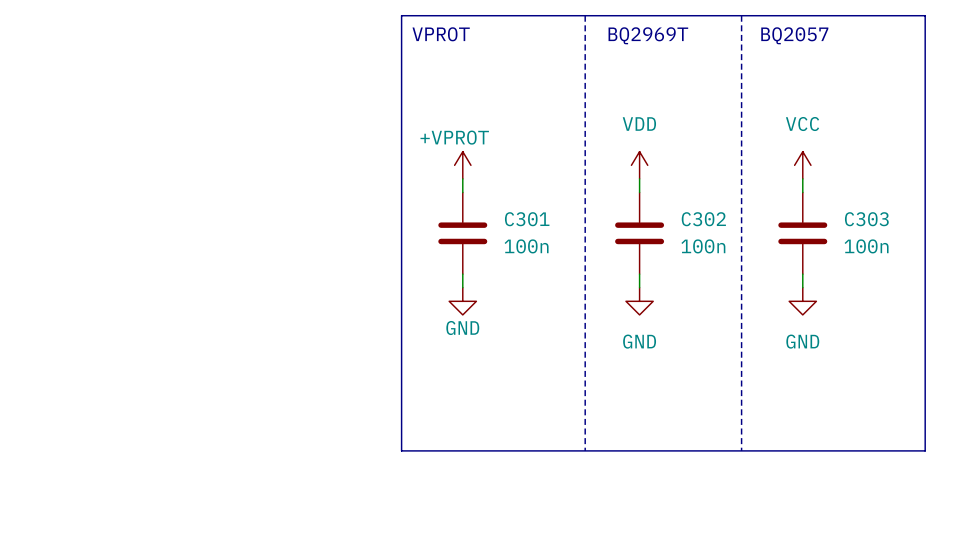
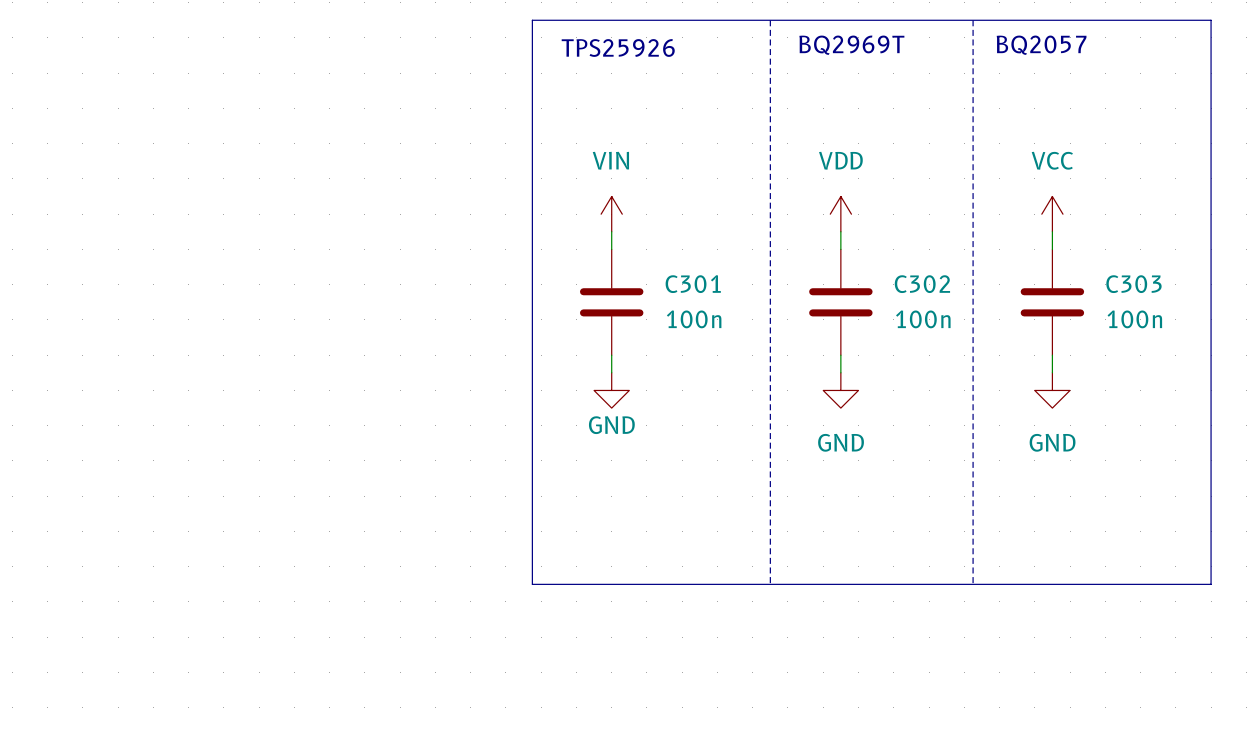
text: VPROT (441, 34) -> none
text: none -> TPS25926 (618, 47)
power symbol: +VPROT (462, 165) -> VIN (611, 214)

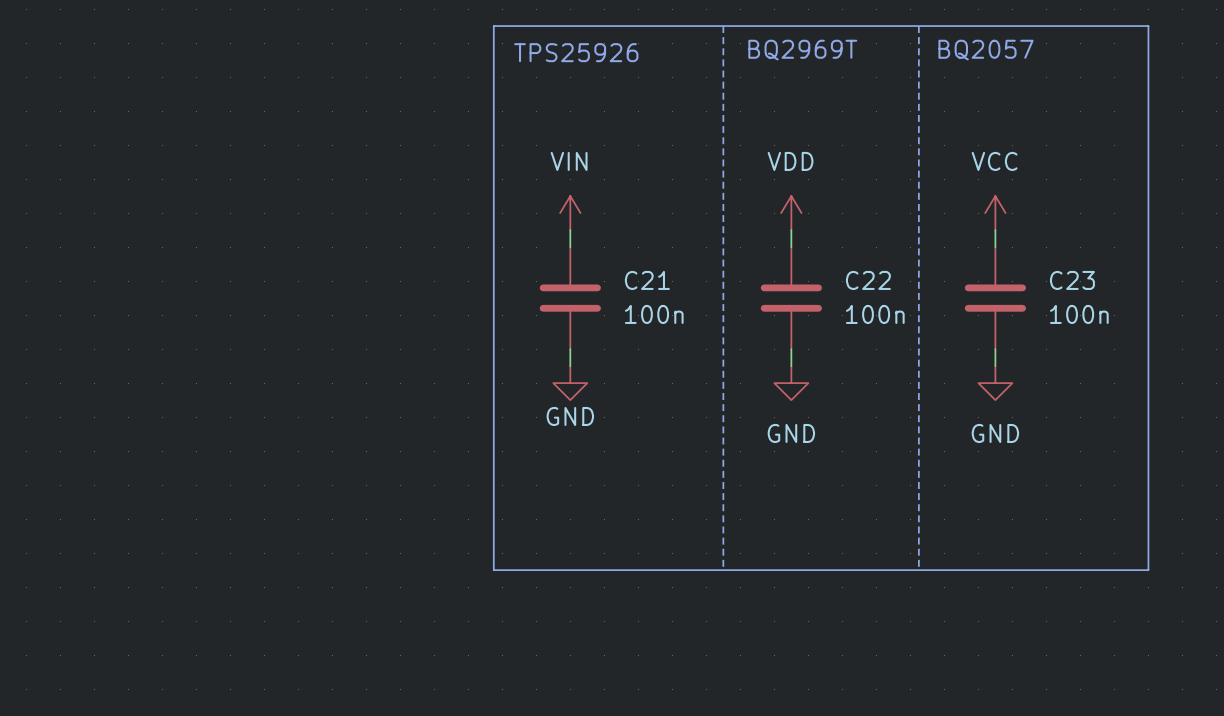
C301 name: C301 (693, 284) -> C21 (647, 280)
C302 name: C302 (922, 284) -> C22 (868, 280)
C303 name: C303 (1133, 284) -> C23 (1072, 280)

